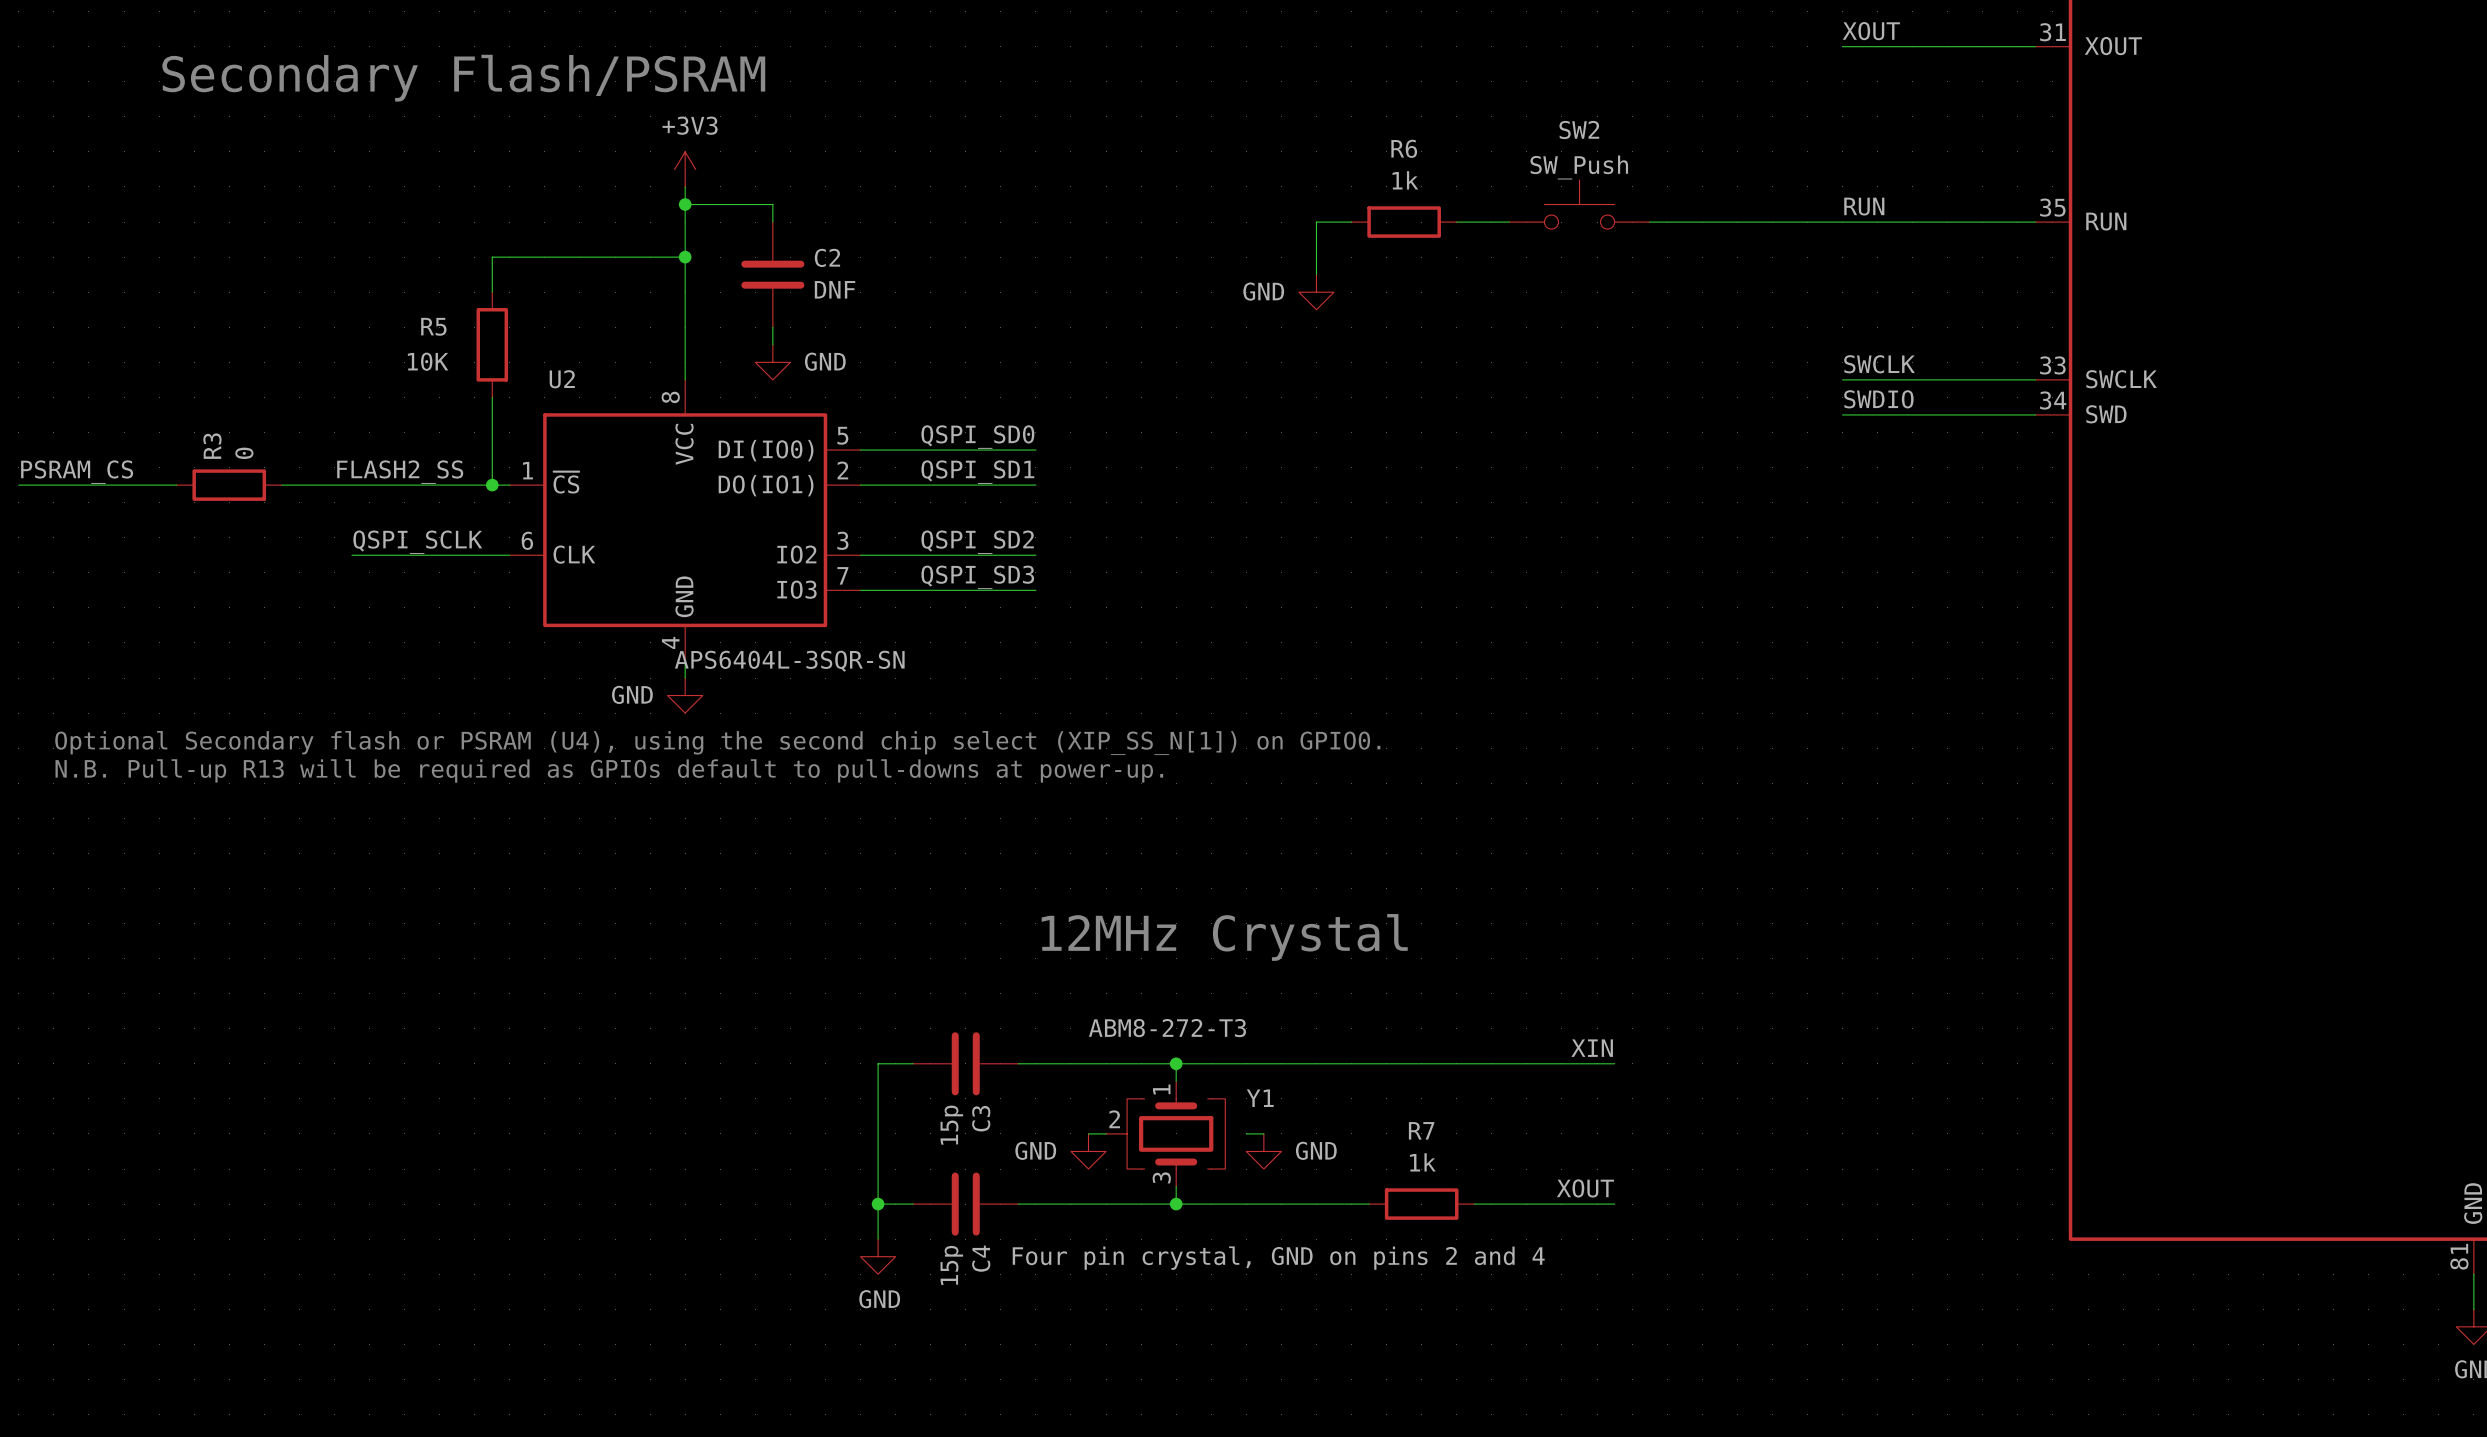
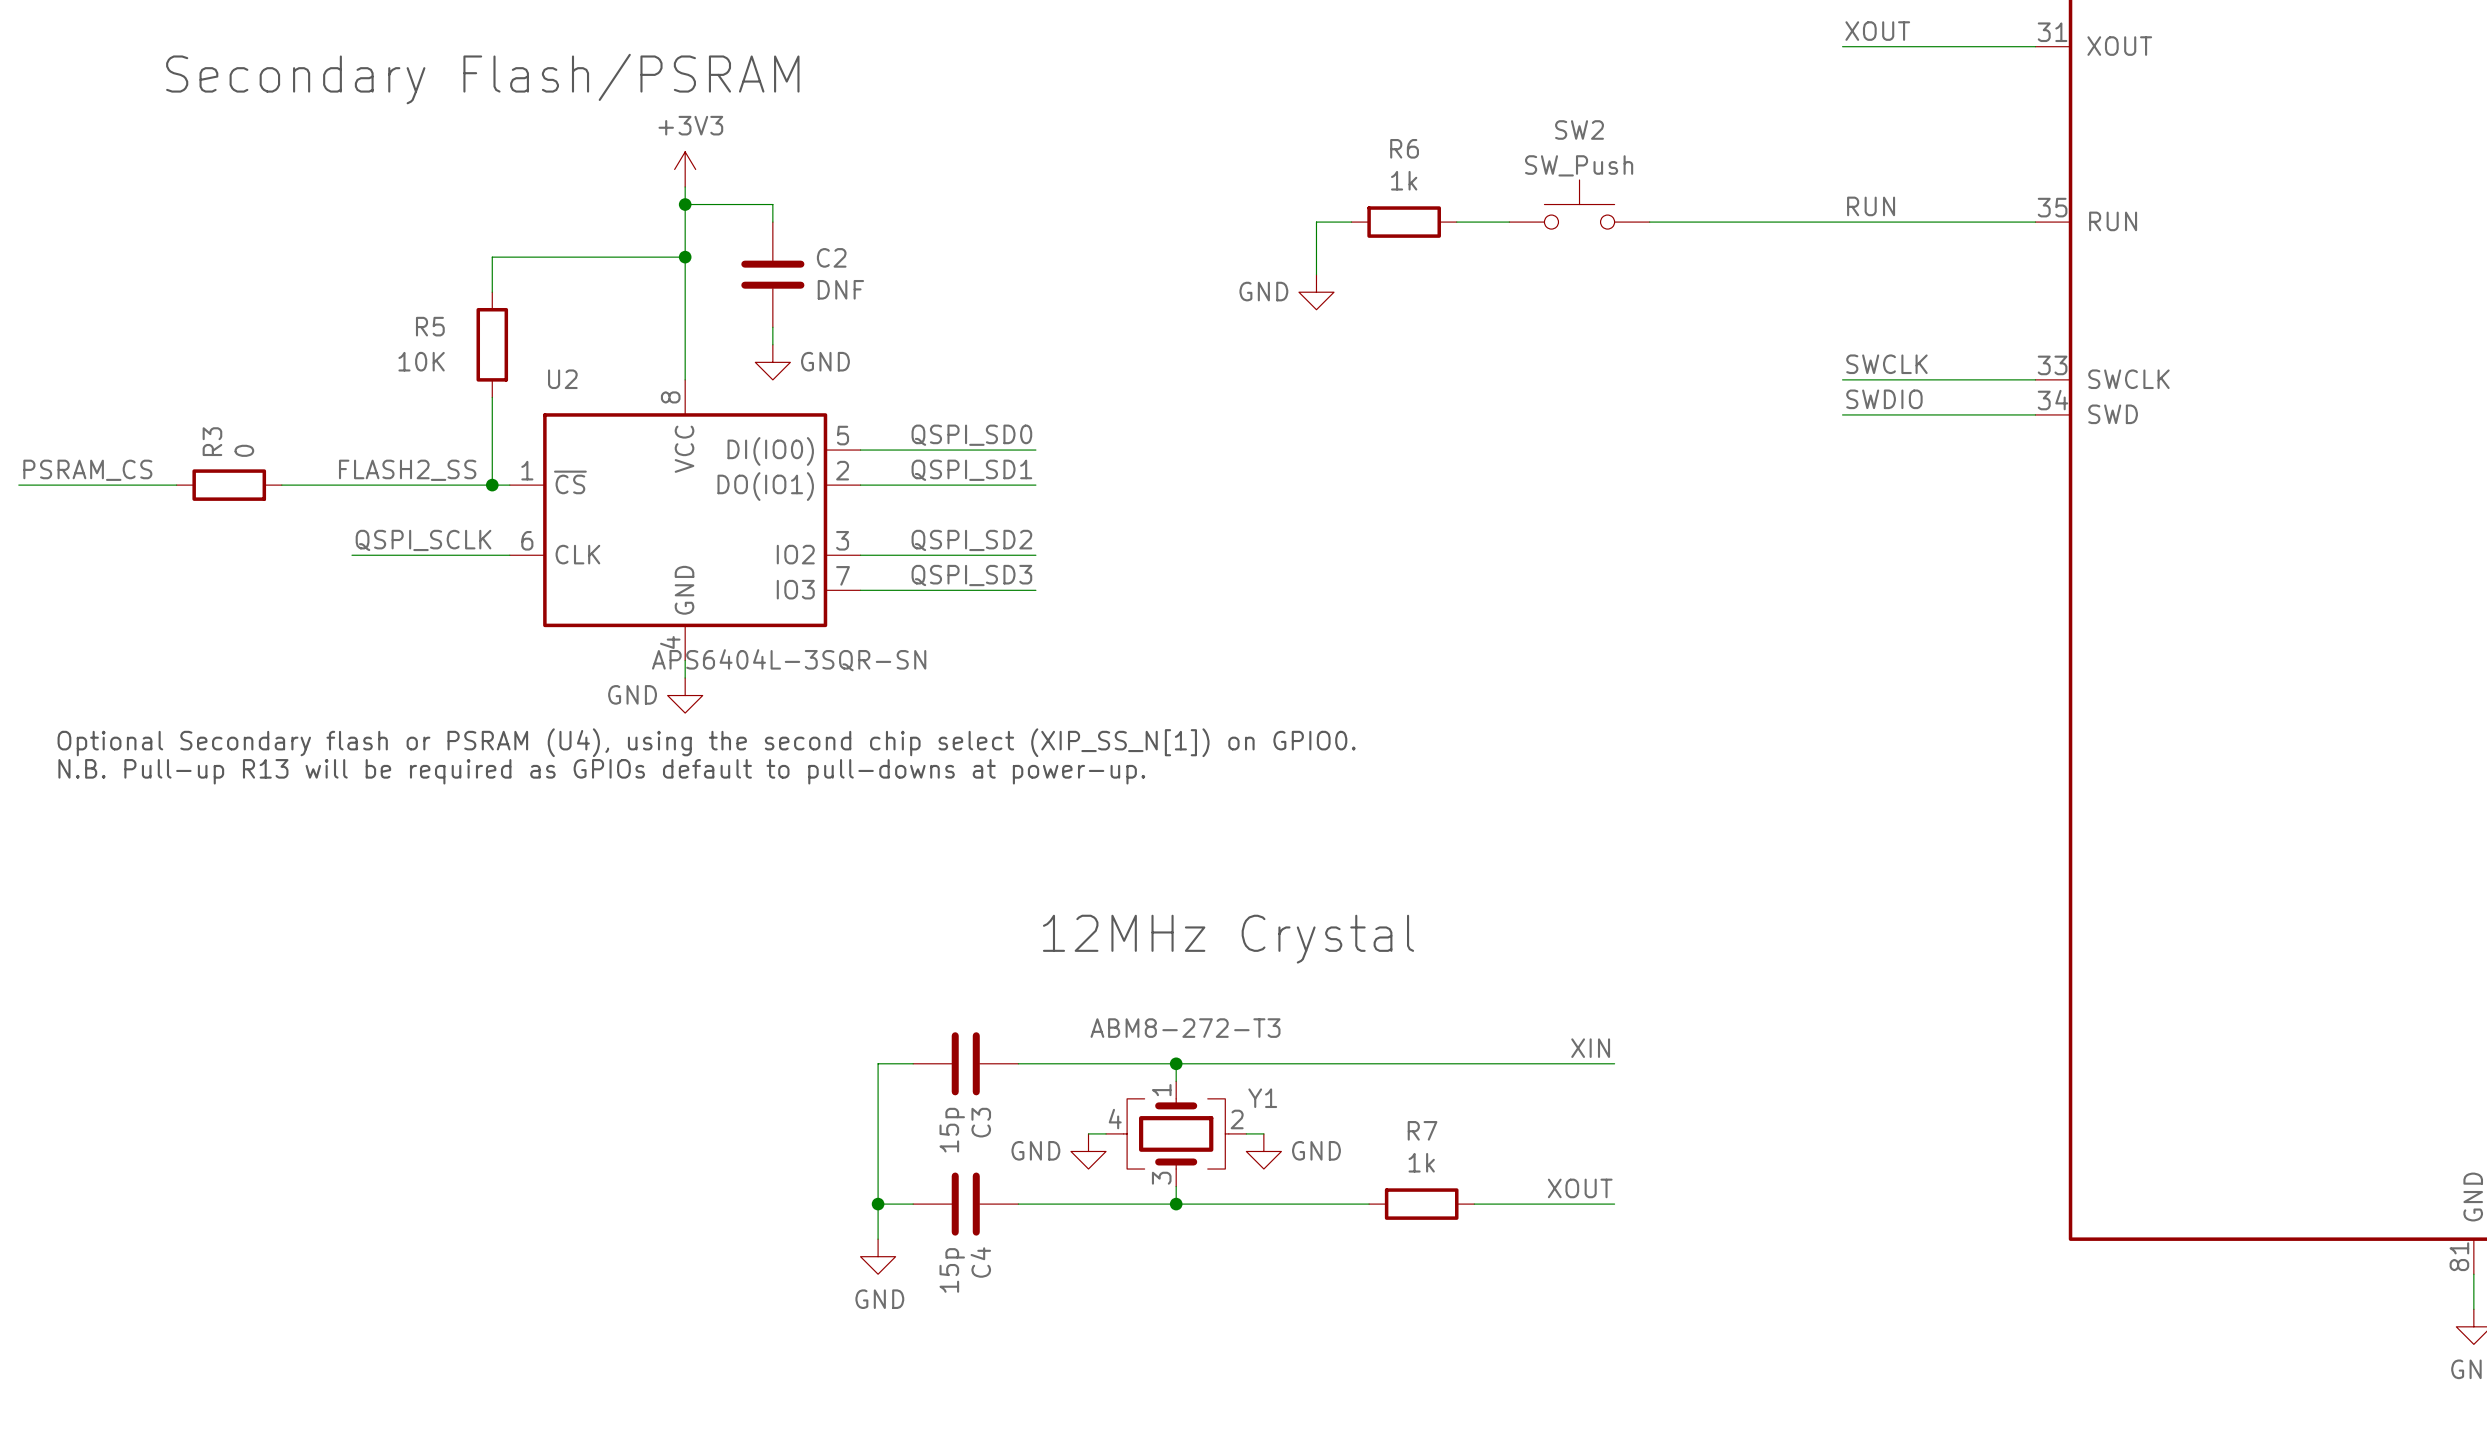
Y1 symbol: [1106, 1081, 1226, 1187] -> [1106, 1081, 1247, 1187]
Y1 text: Four pin crystal, GND on pins 2 and 4 (1278, 1258) -> none

